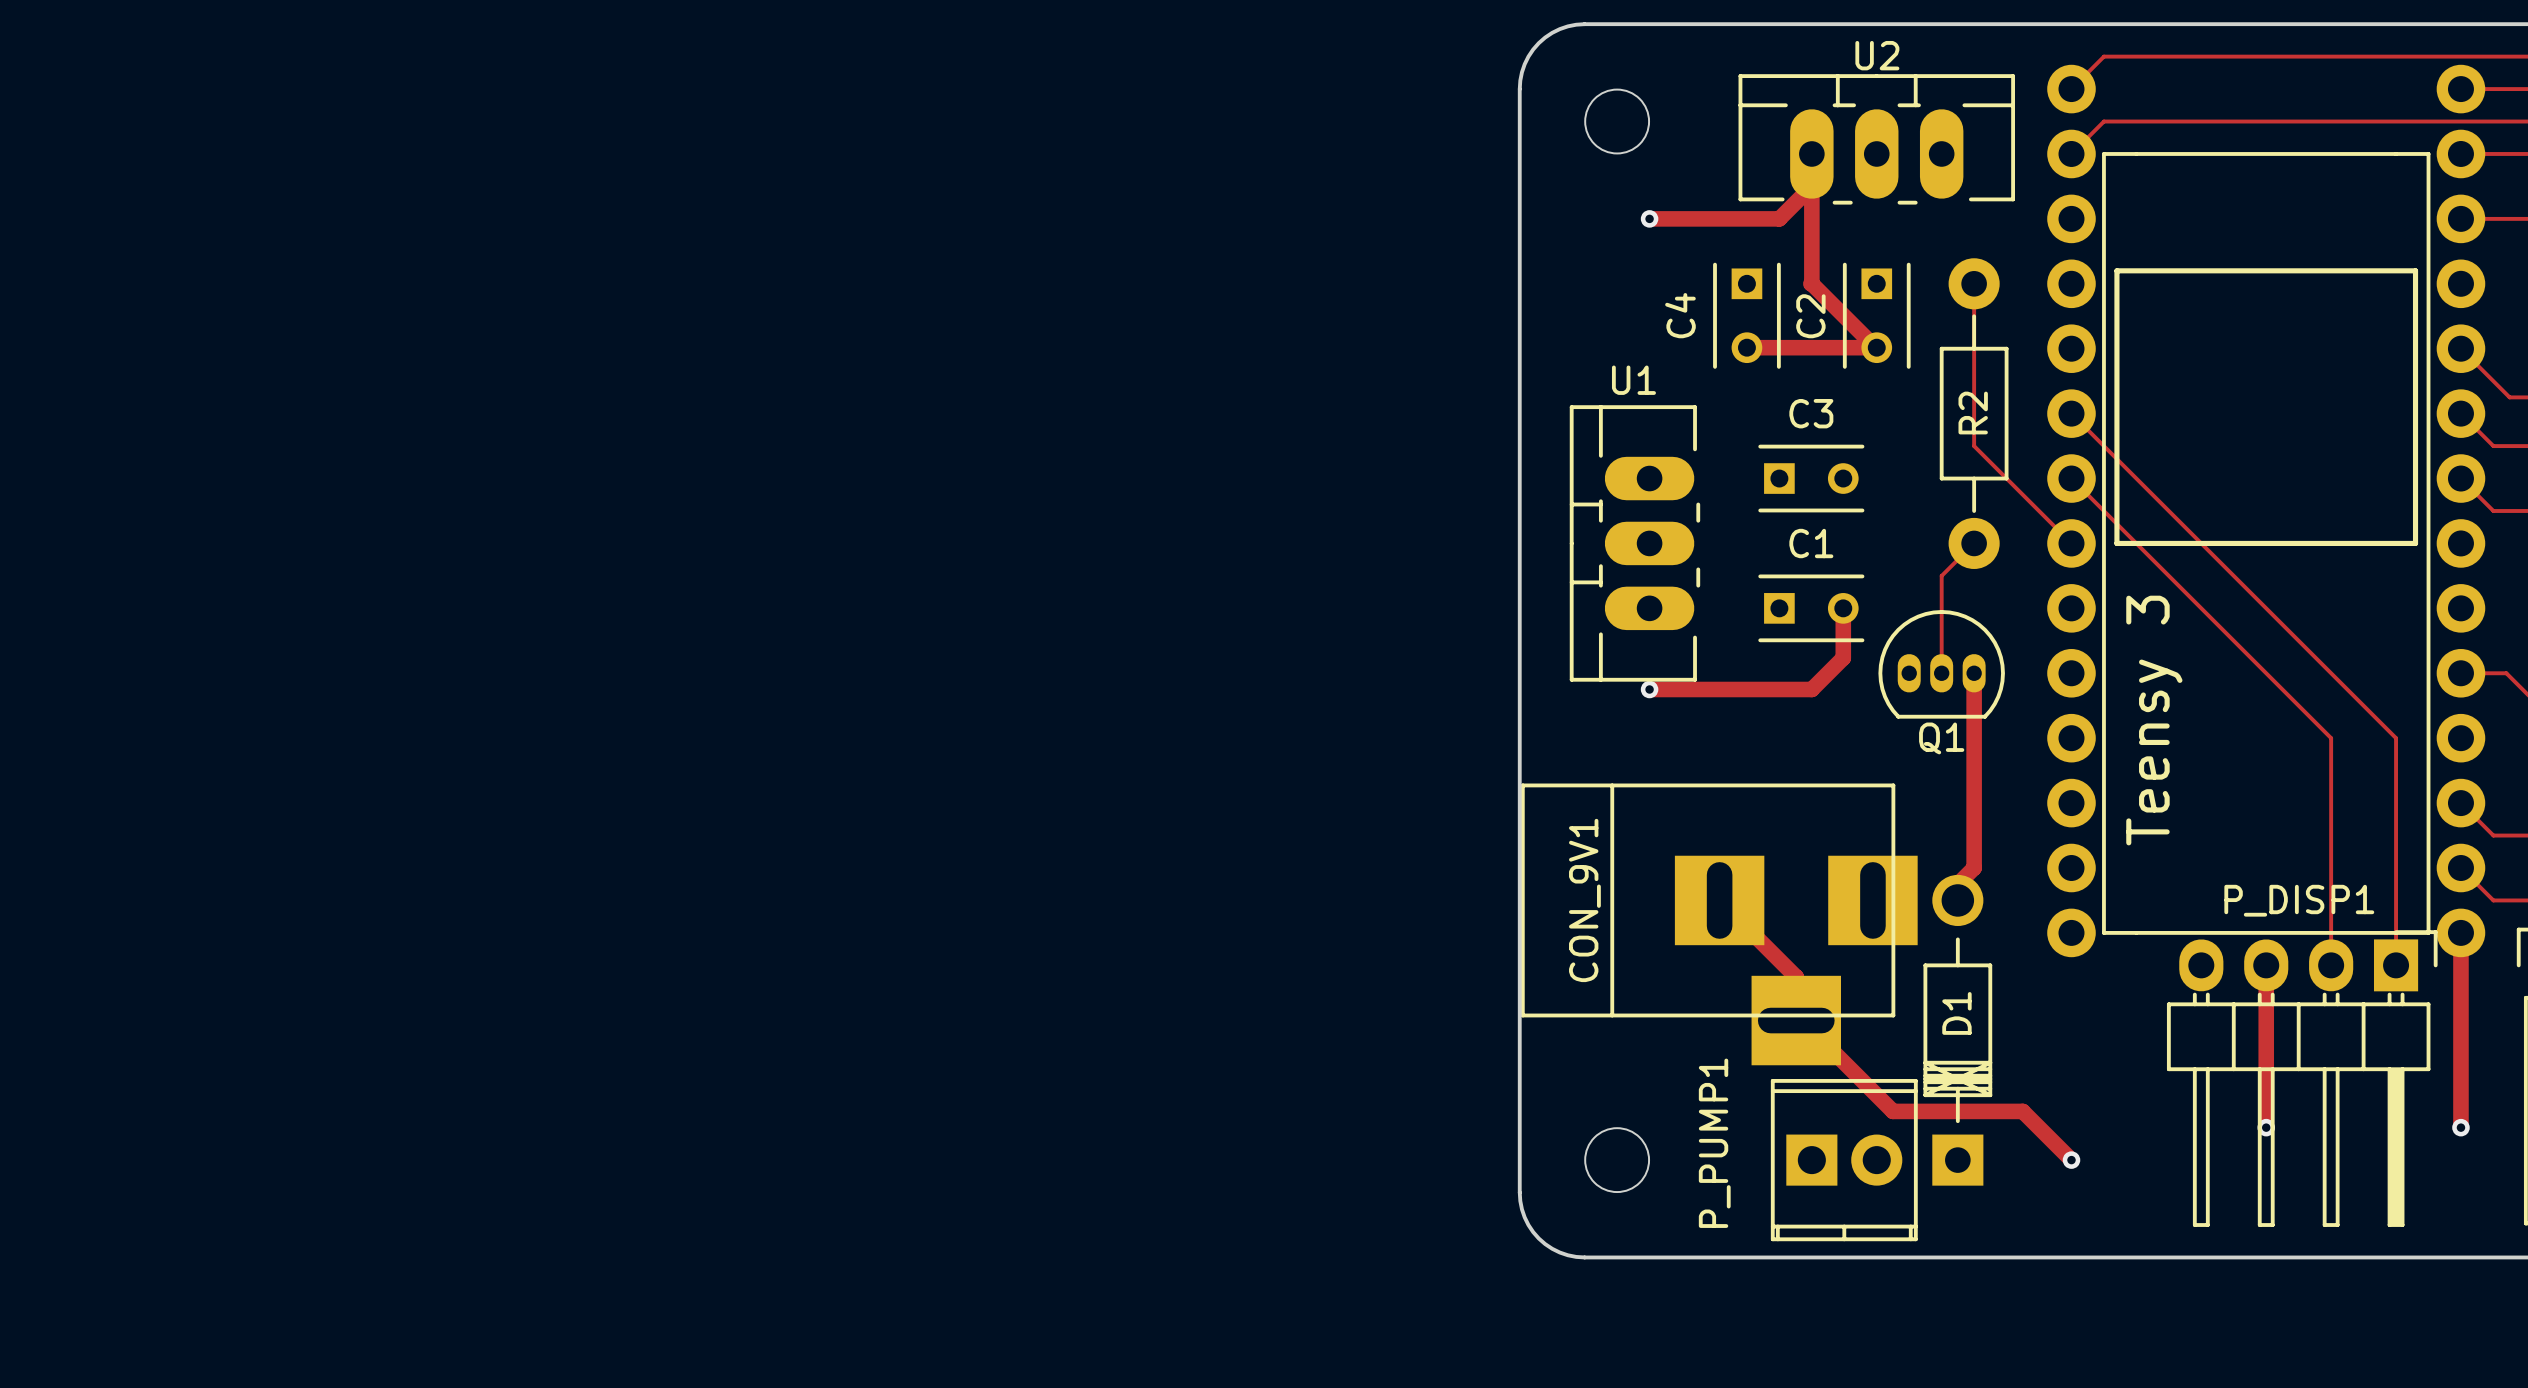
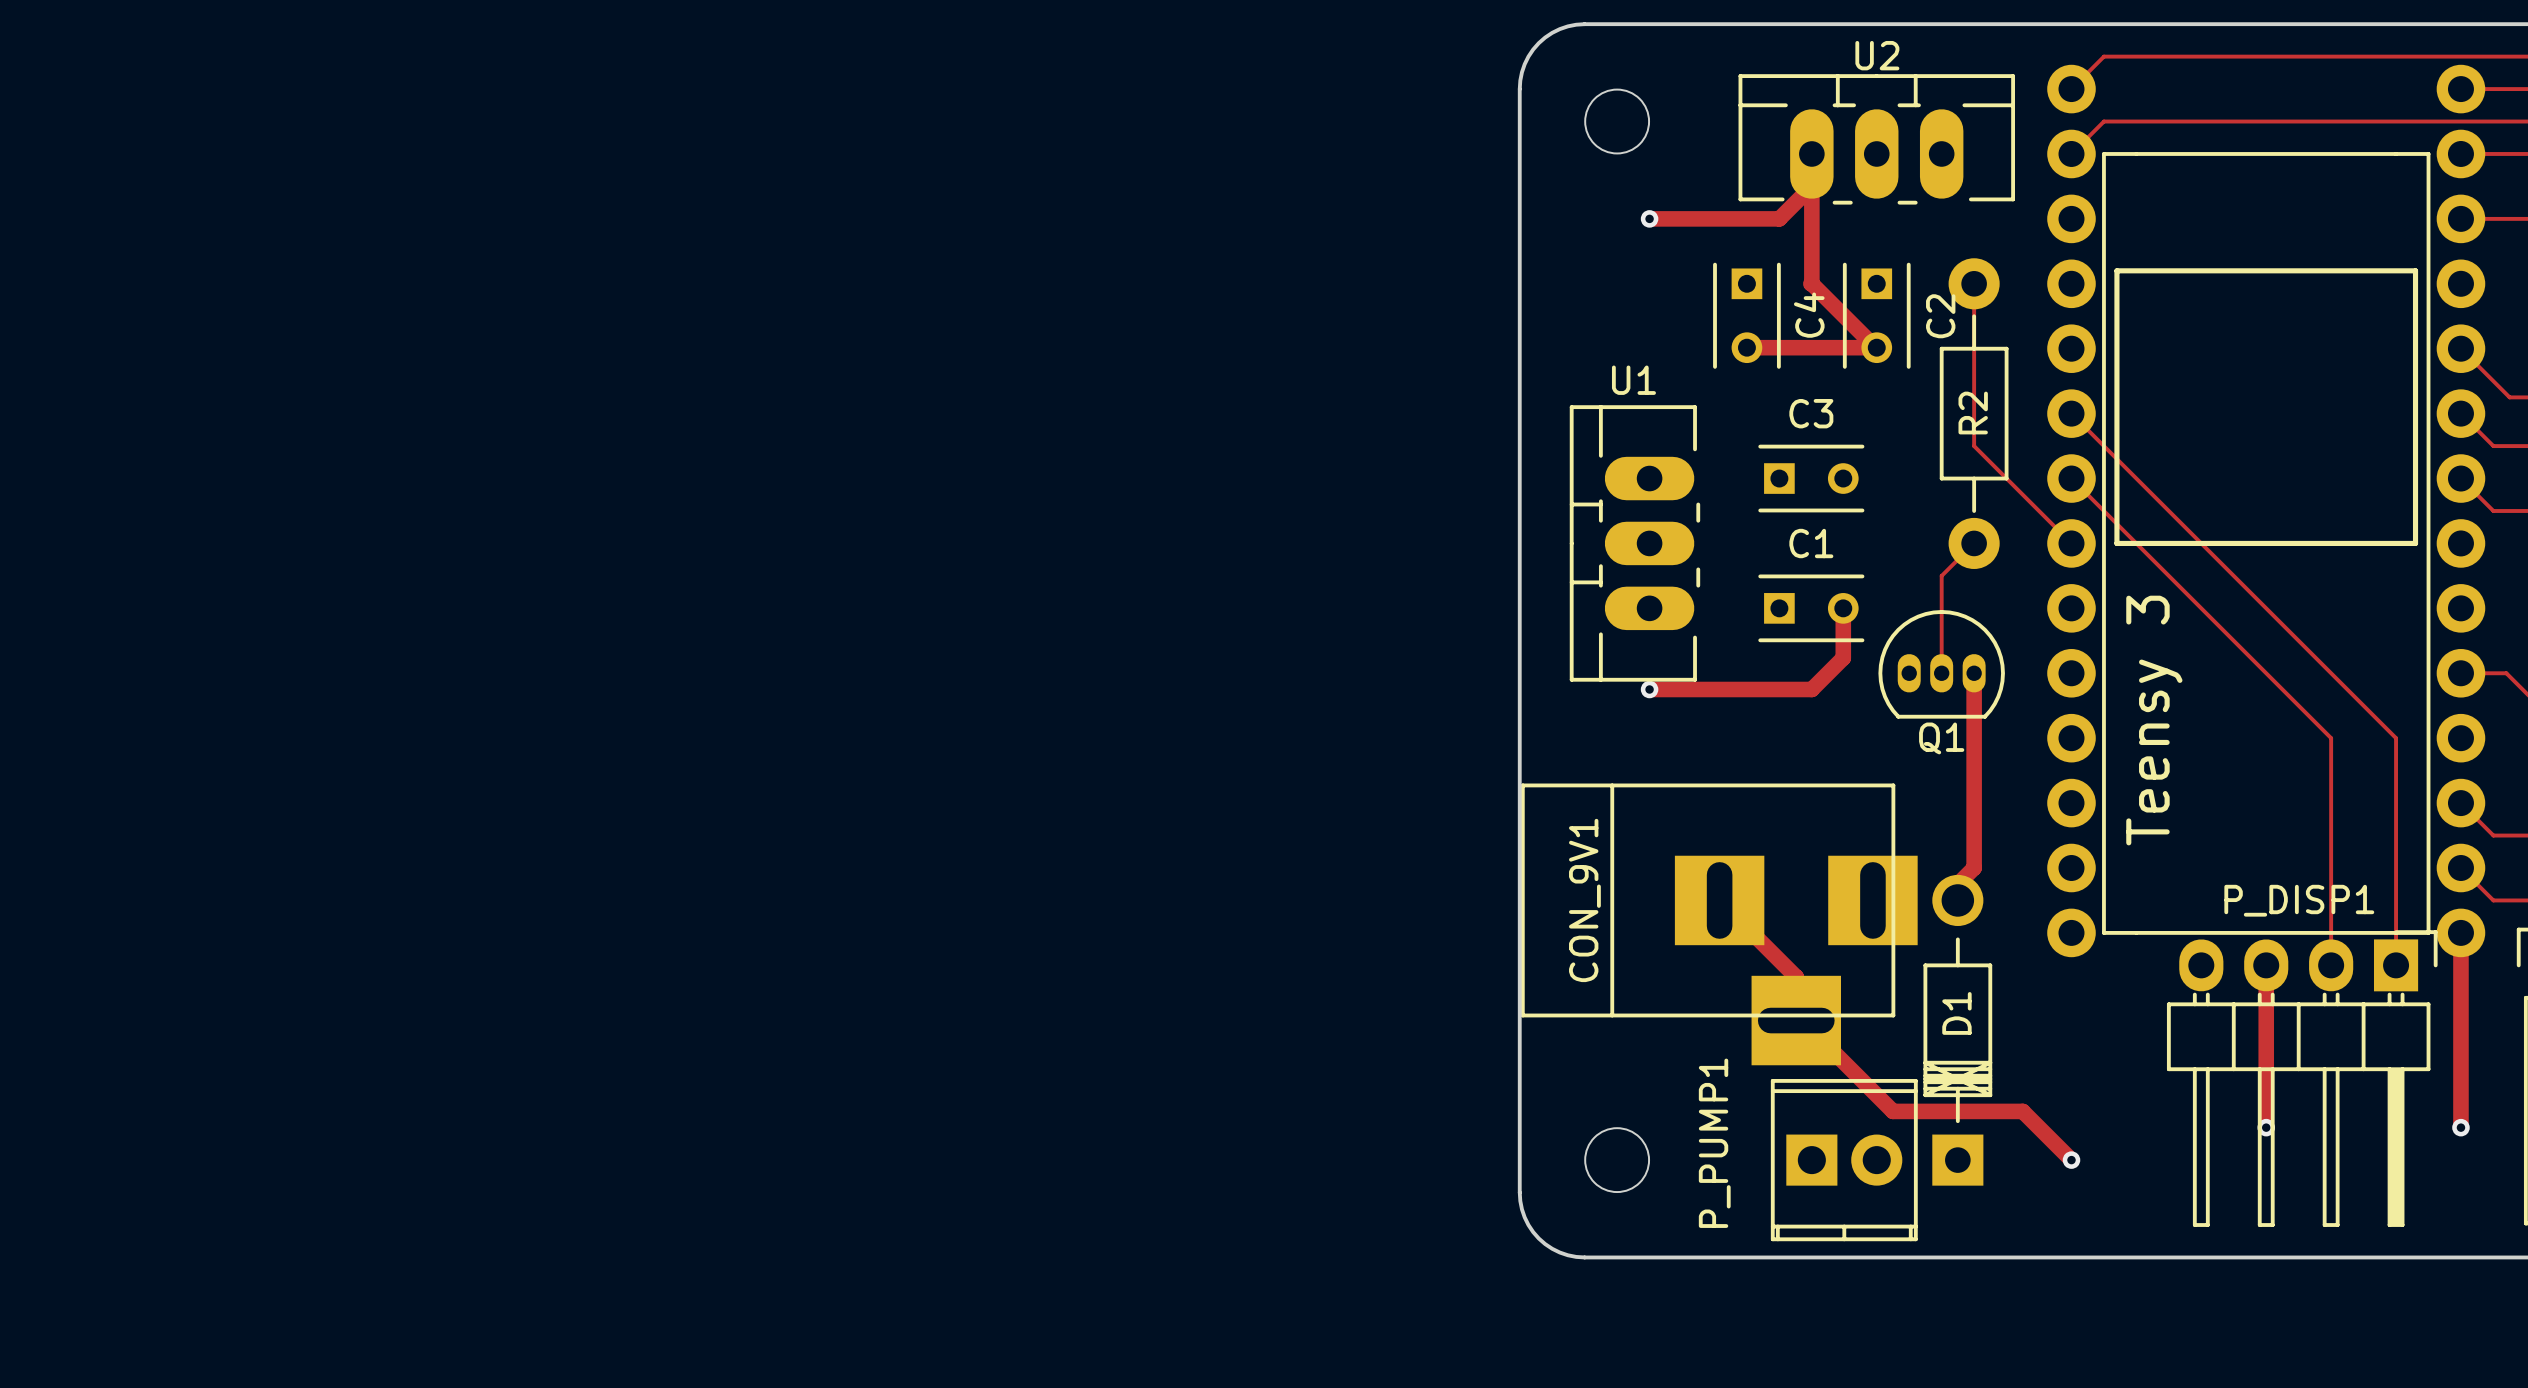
C4 name position: C4 (1680, 315) -> C4 (1809, 315)
C2 name position: C2 (1810, 316) -> C2 (1940, 316)

